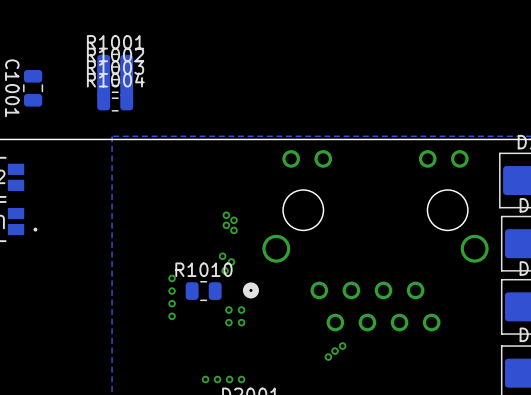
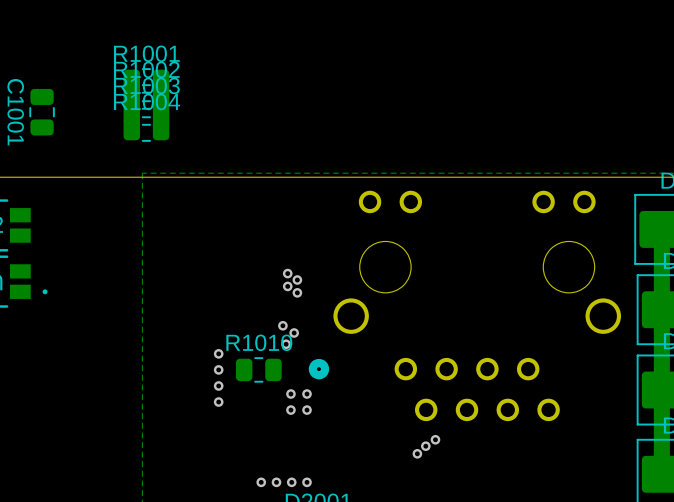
track: none -> (661, 229) (661, 474)

